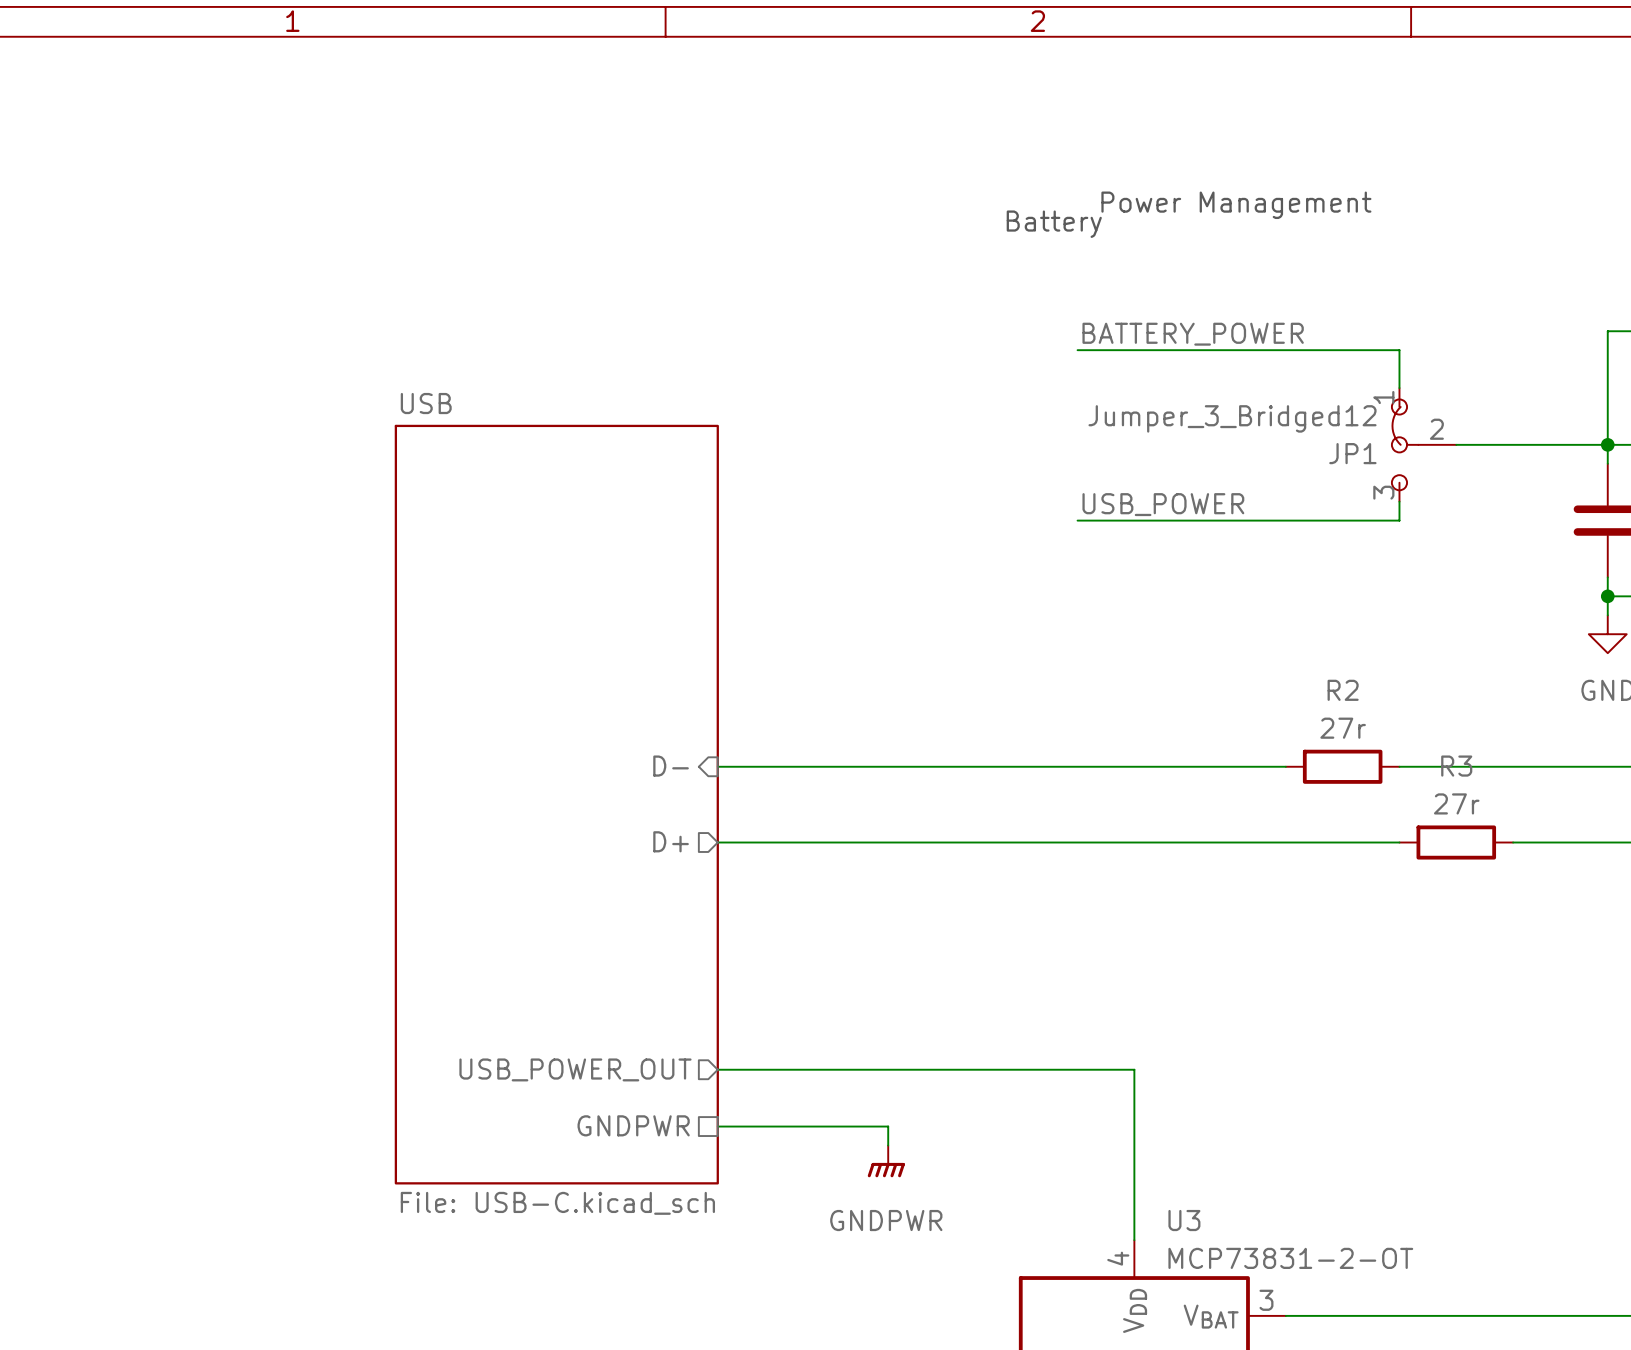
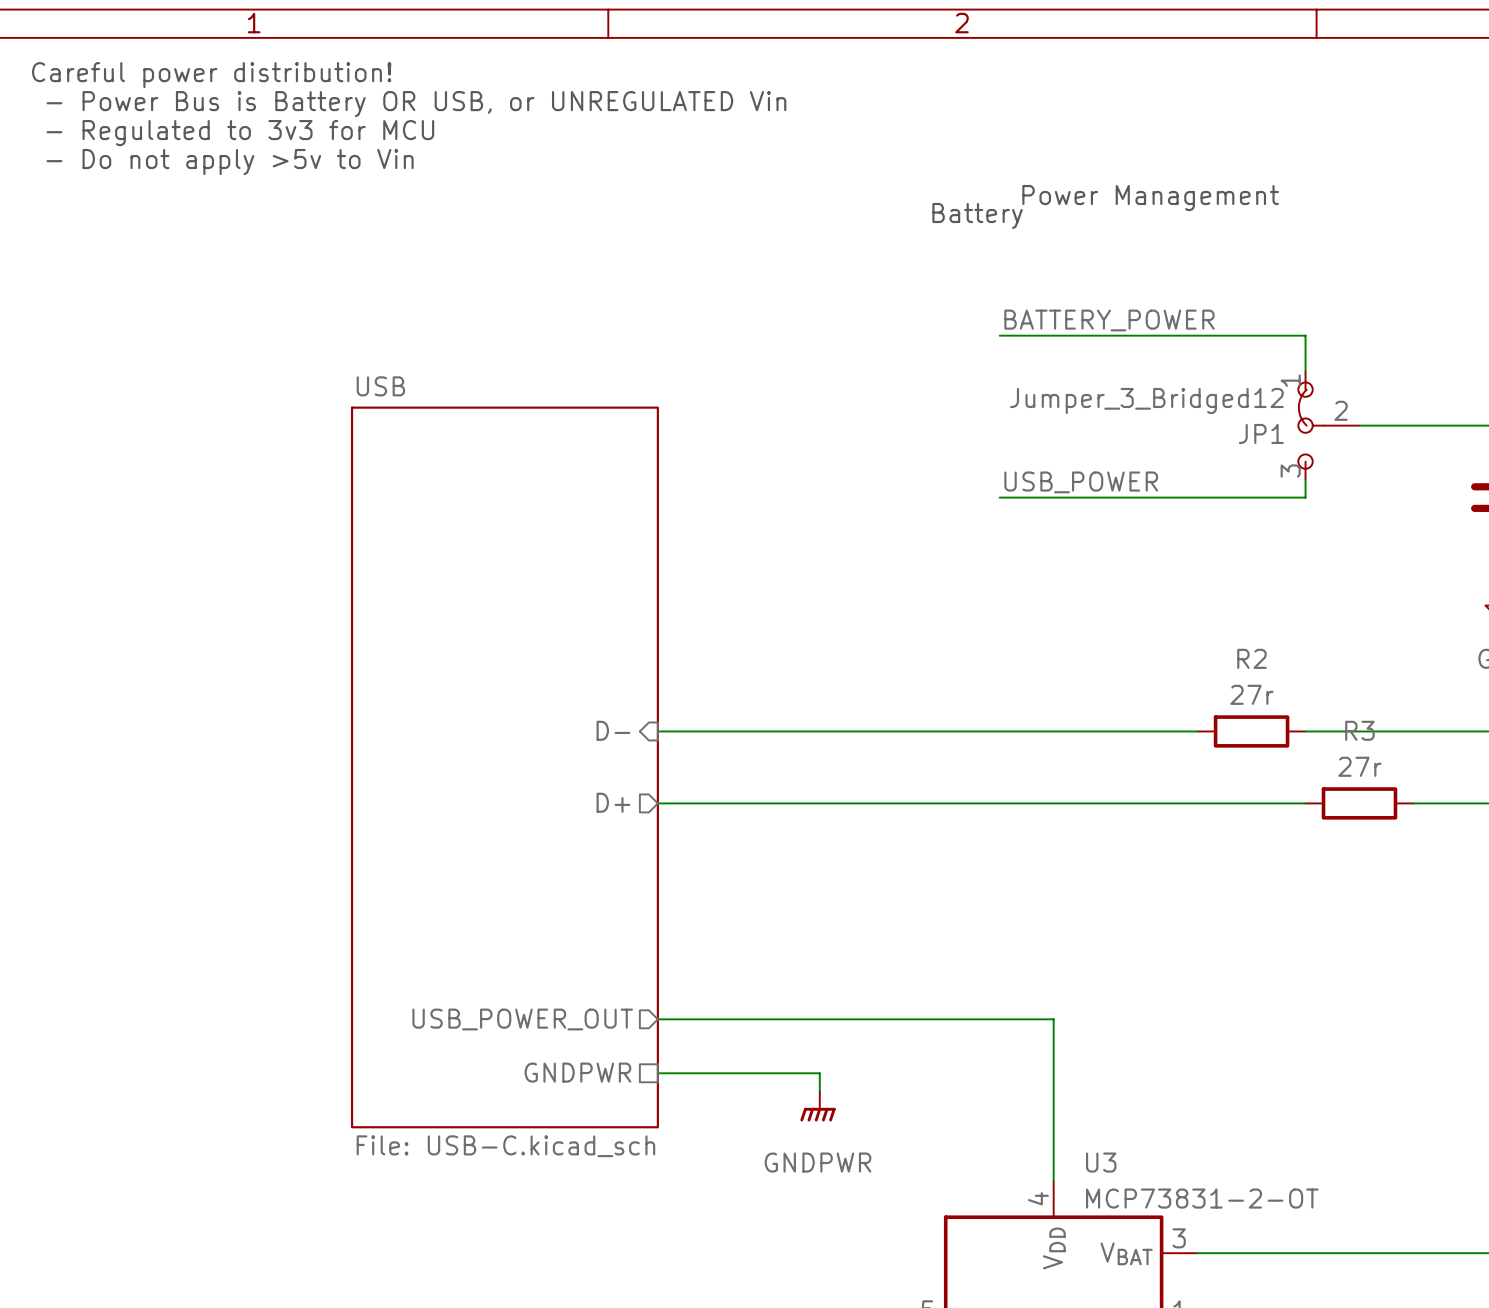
text: none -> Careful power distribution! (211, 75)
text: none -> - Power Bus is Battery OR USB, or UNREGULATED Vin (416, 104)
text: none -> - Regulated to 3v3 for MCU (240, 133)
text: none -> - Do not apply >5v to Vin (230, 162)

